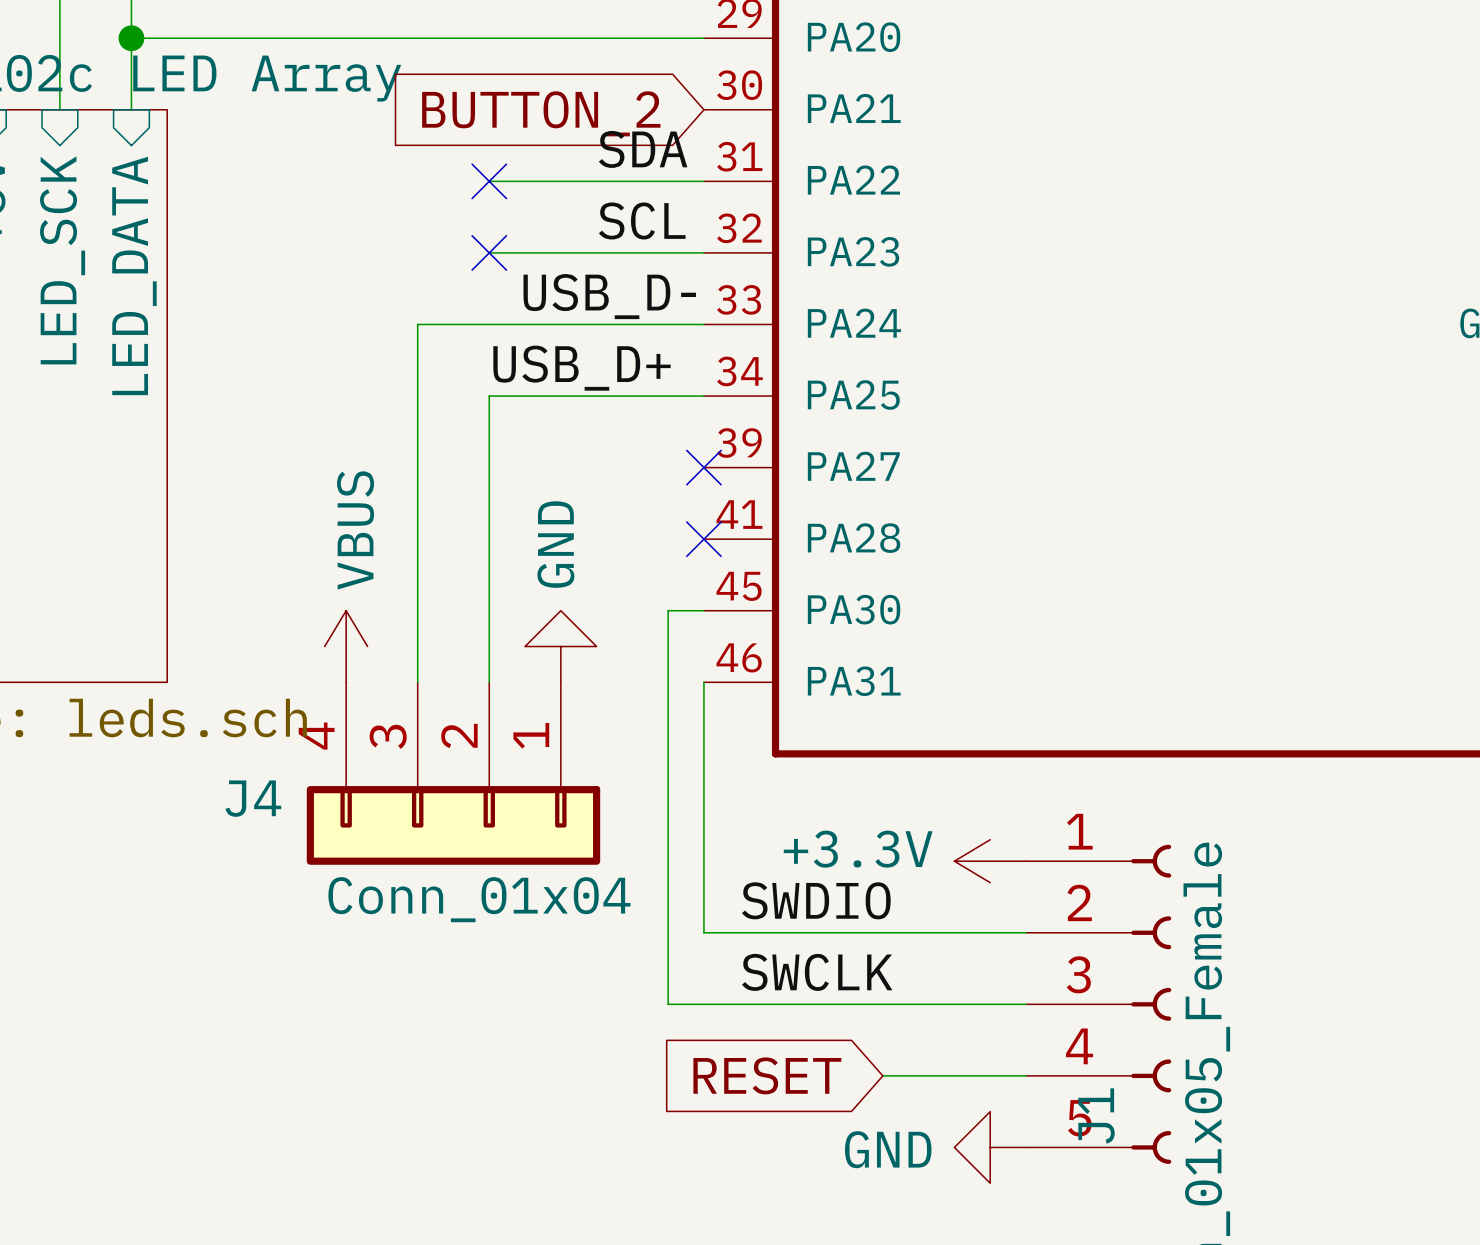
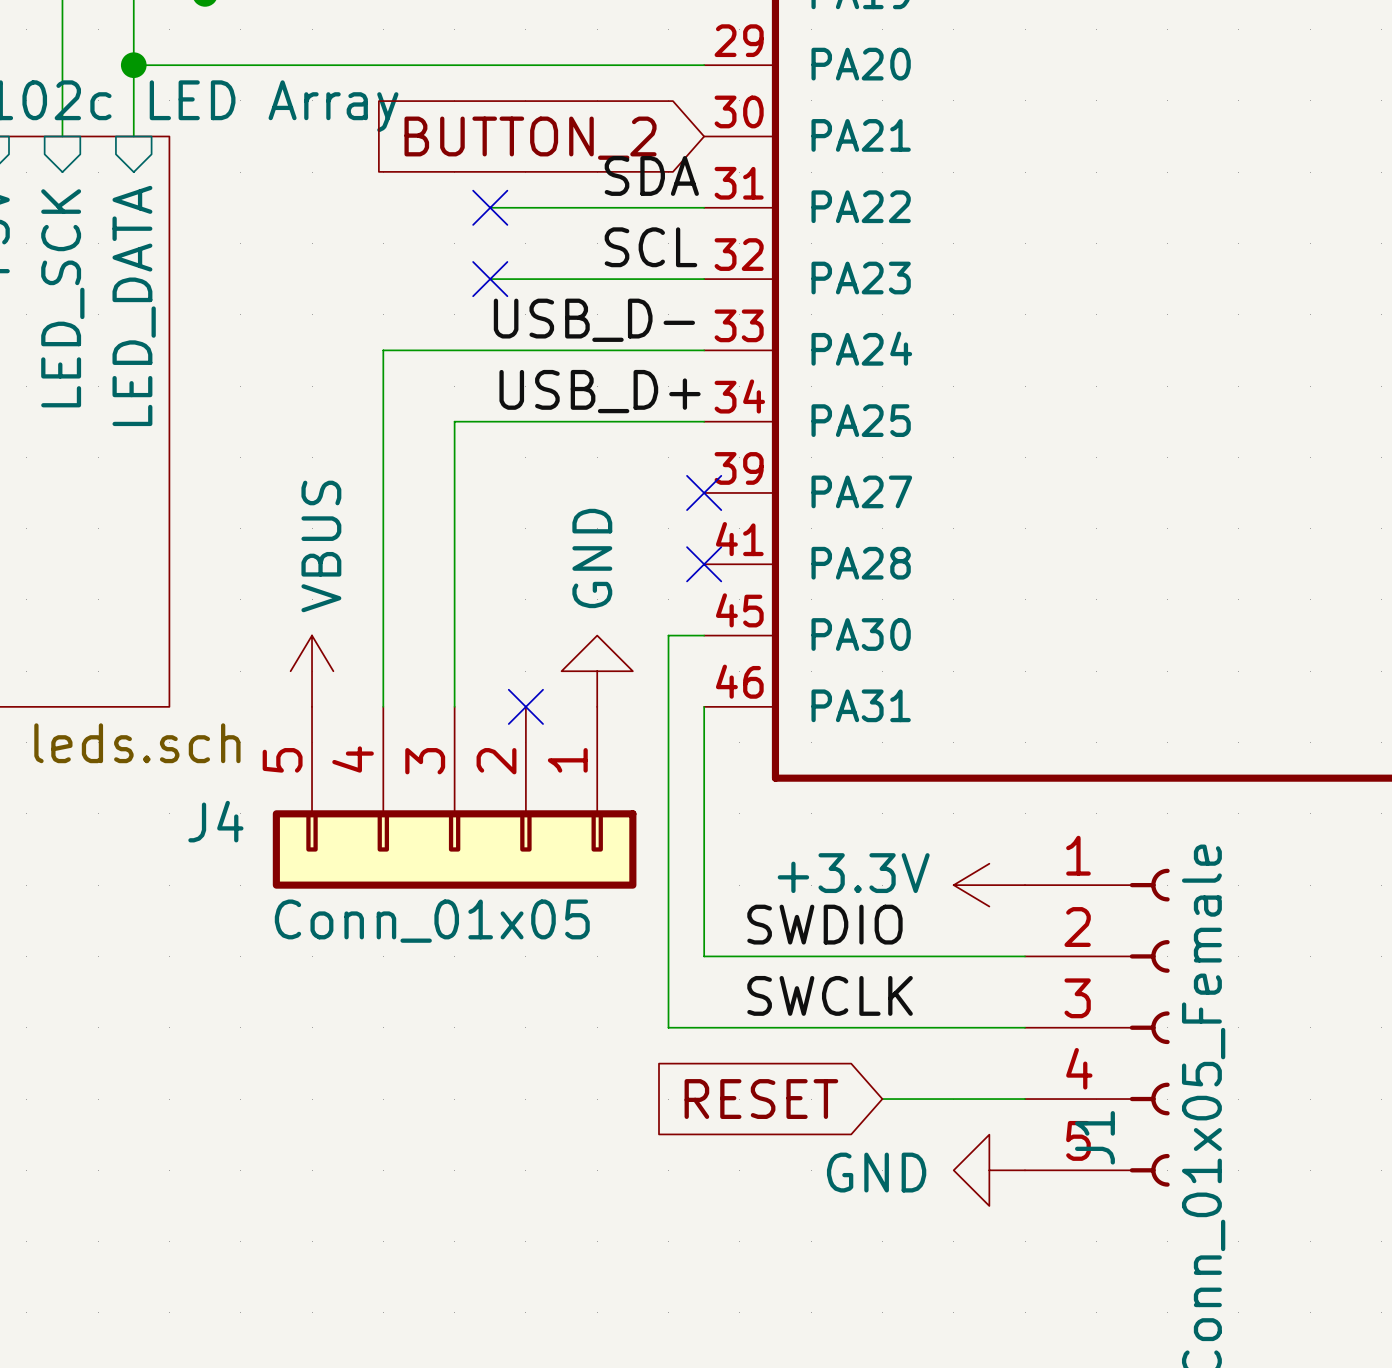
wire: (417, 324) (417, 682) -> (418, 350) (383, 350) (383, 706)
wire: (489, 396) (489, 682) -> (490, 421) (454, 421) (454, 706)
power symbol position: VBUS (346, 646) -> VBUS (312, 671)
power symbol position: GND (560, 646) -> GND (597, 671)
J4 symbol: [306, 682, 601, 865] -> [272, 706, 637, 889]
no-connect mark: none -> (525, 706)
J4 value: Conn_01x04 (479, 899) -> Conn_01x05 (432, 921)

